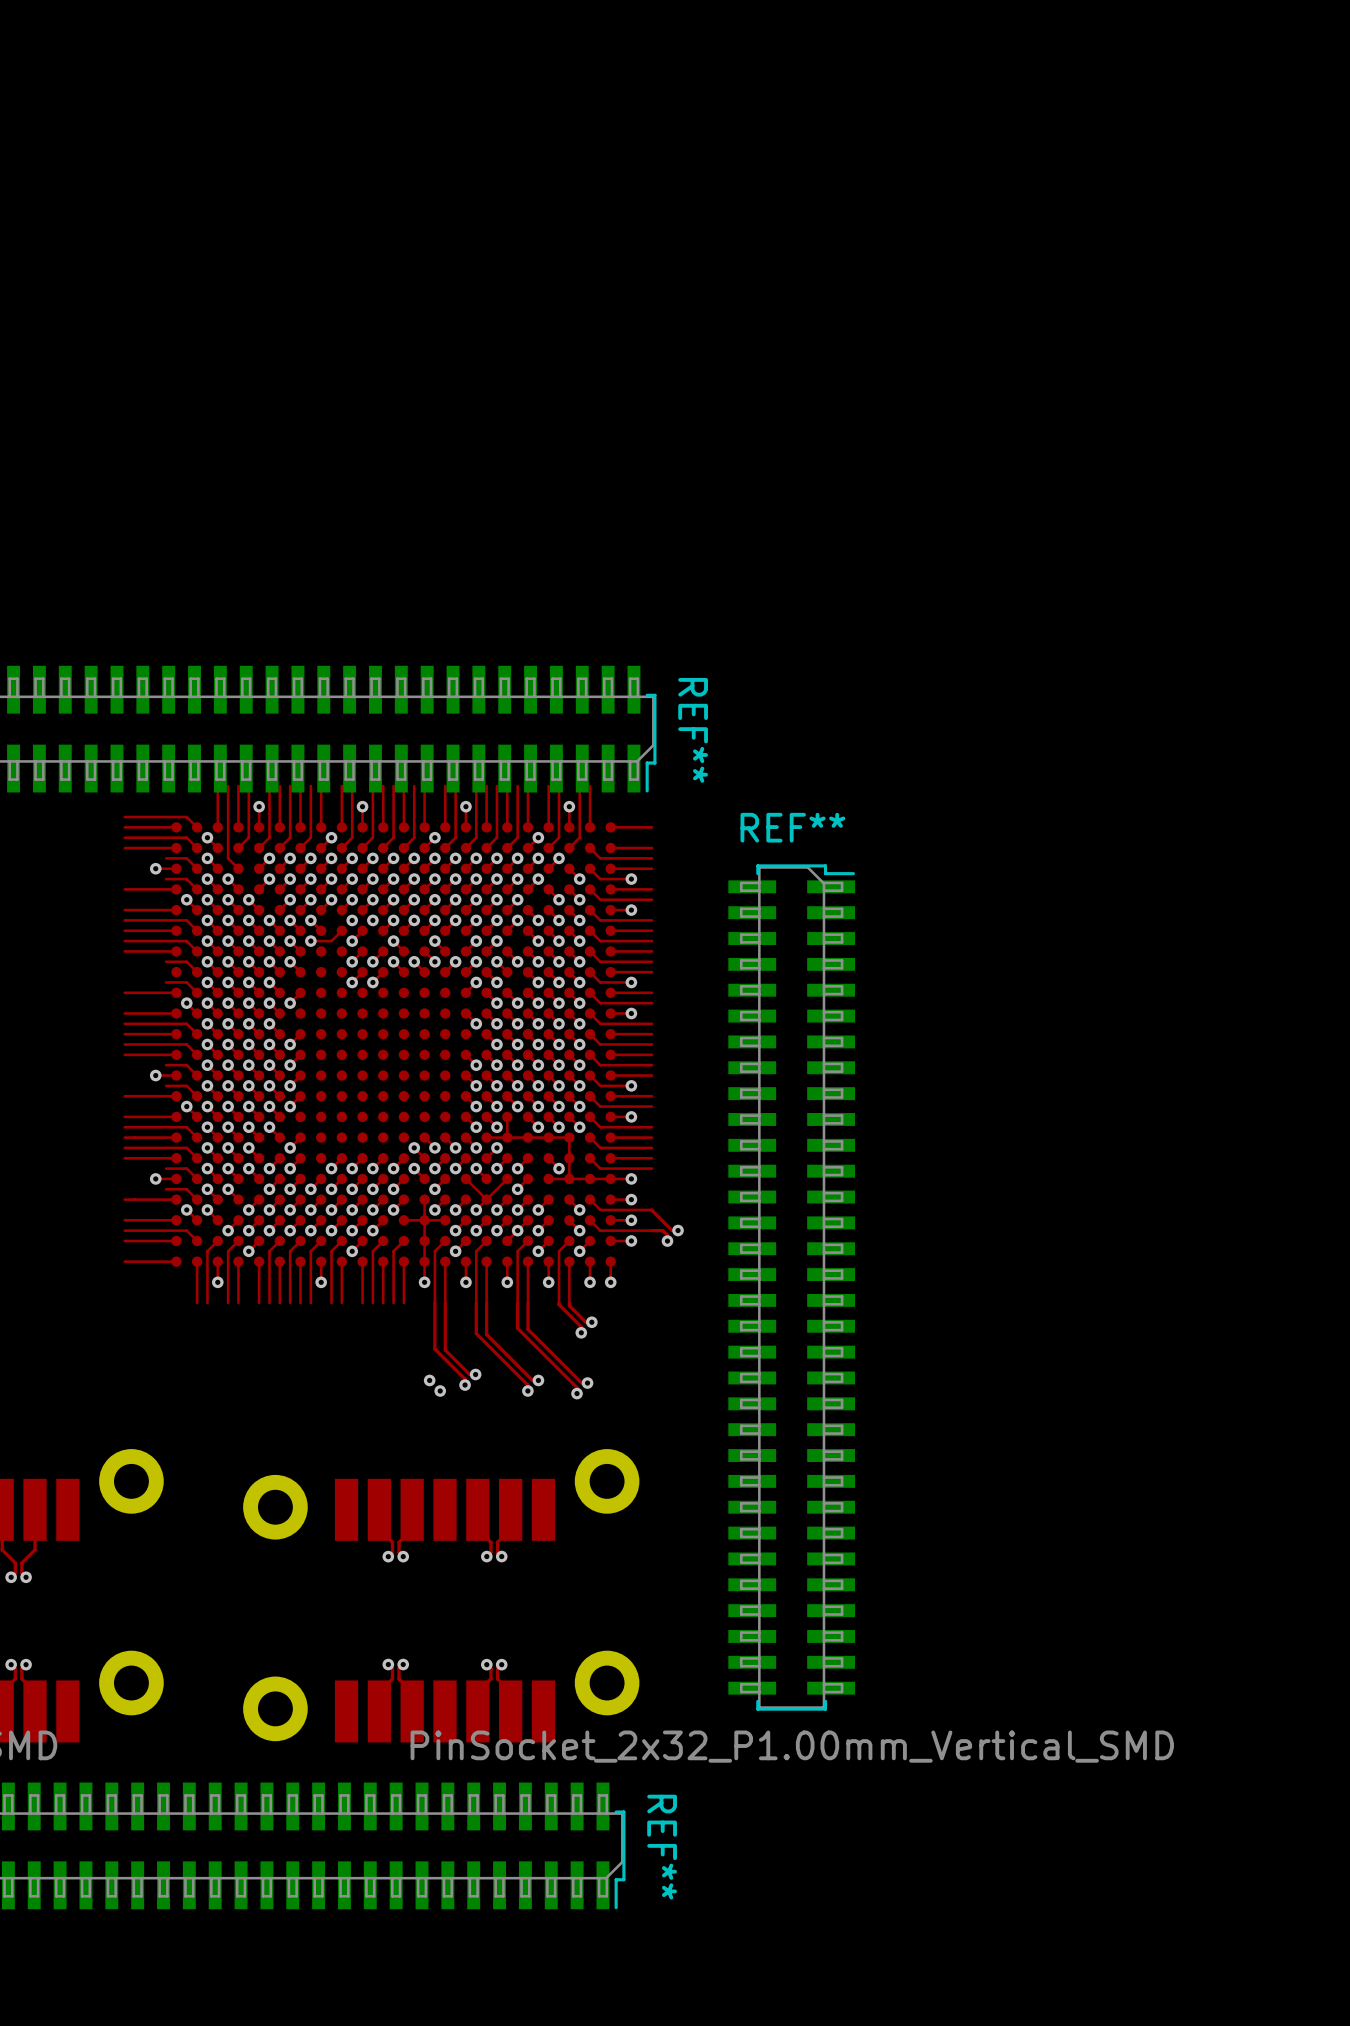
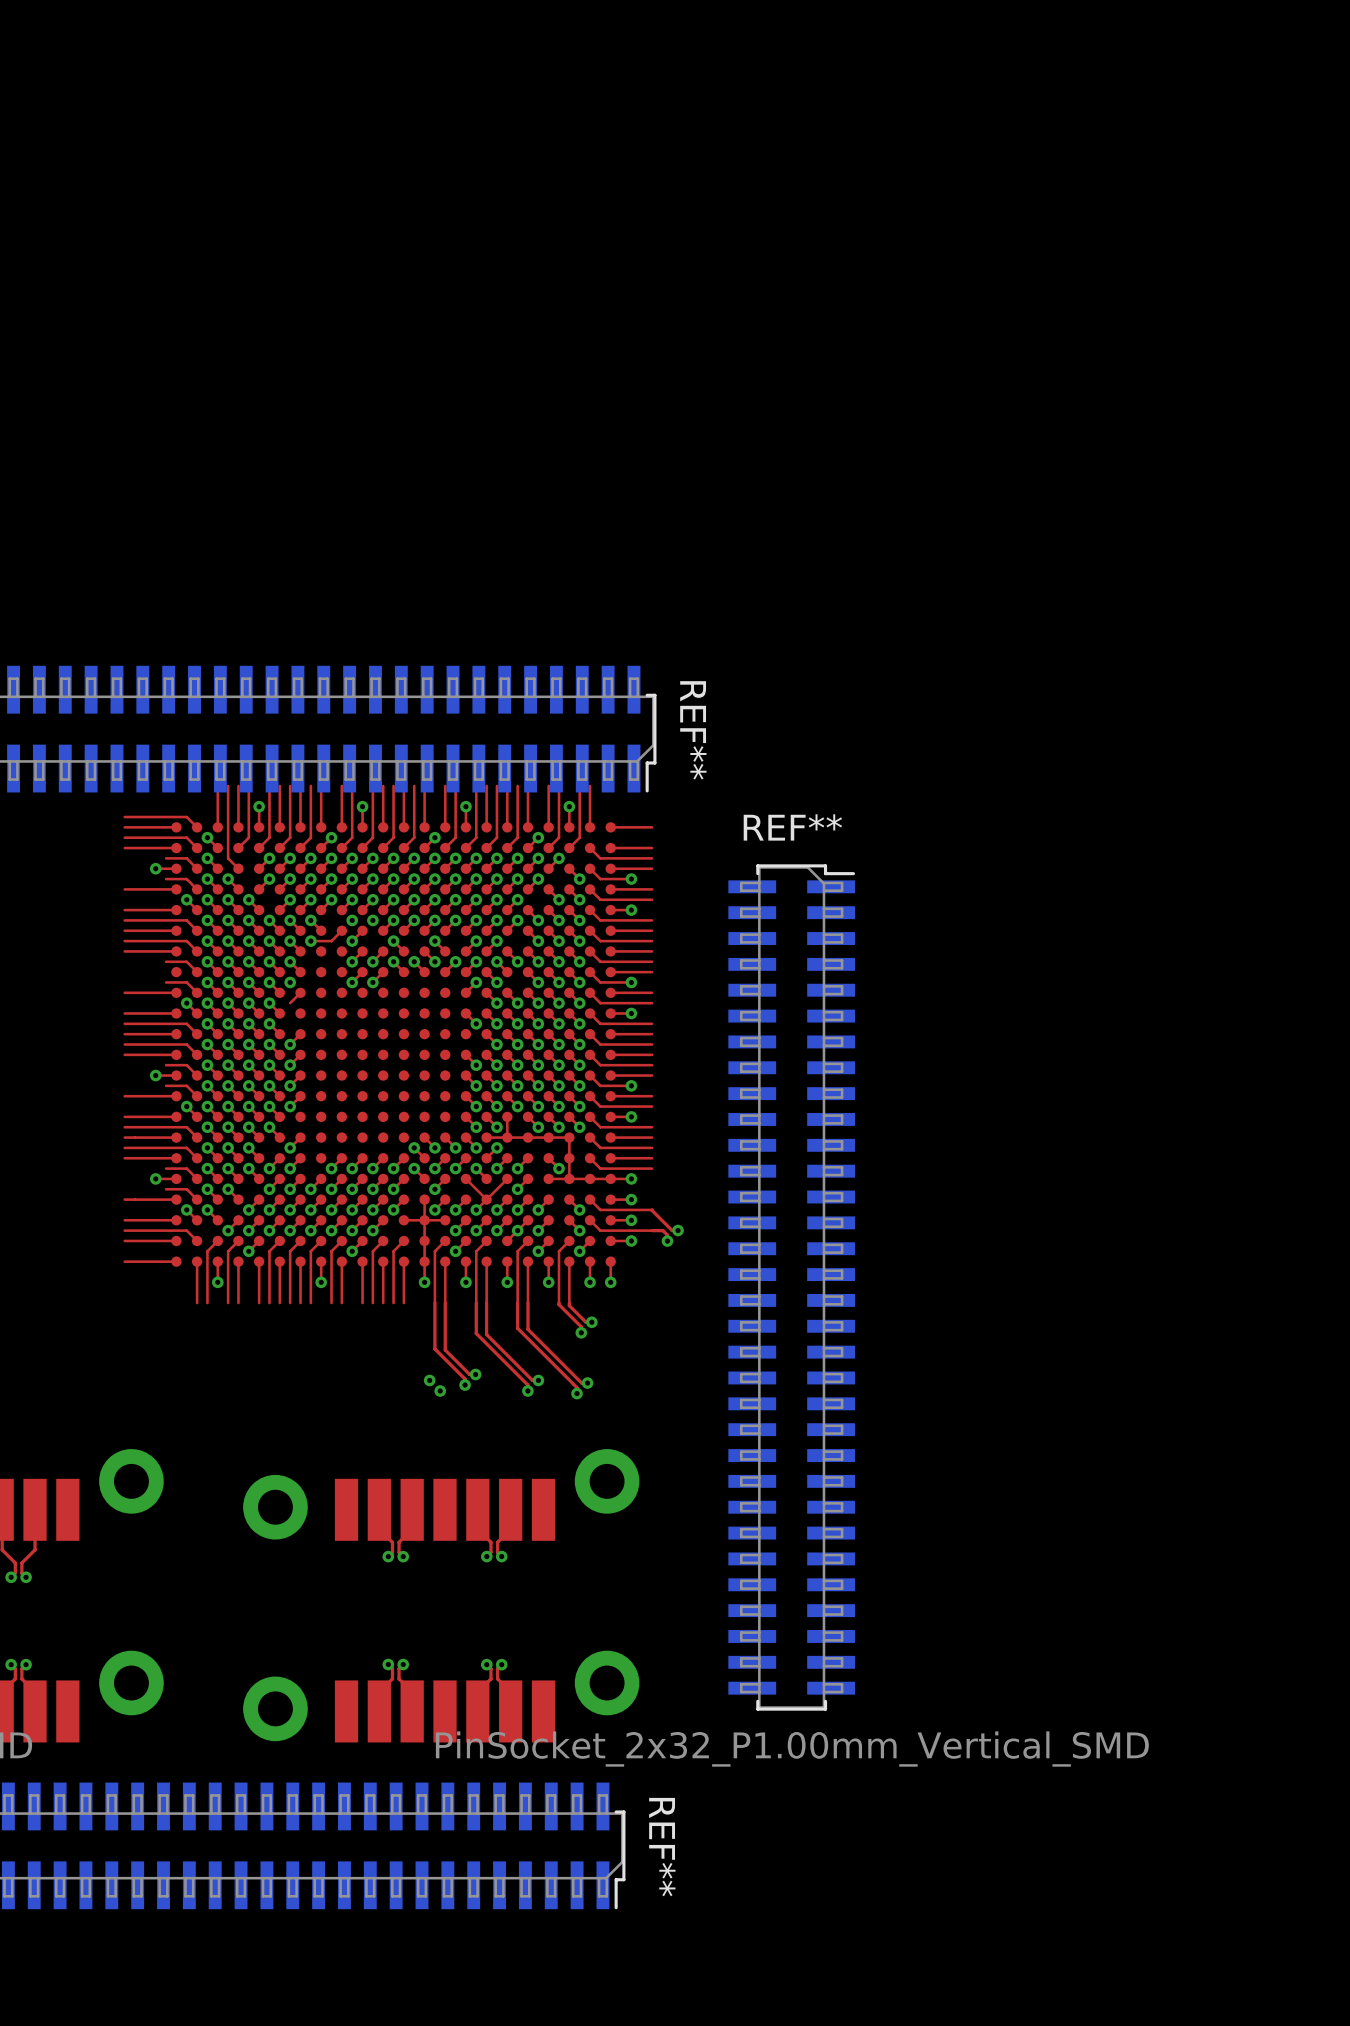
via position: (290, 1003) -> (290, 982)

